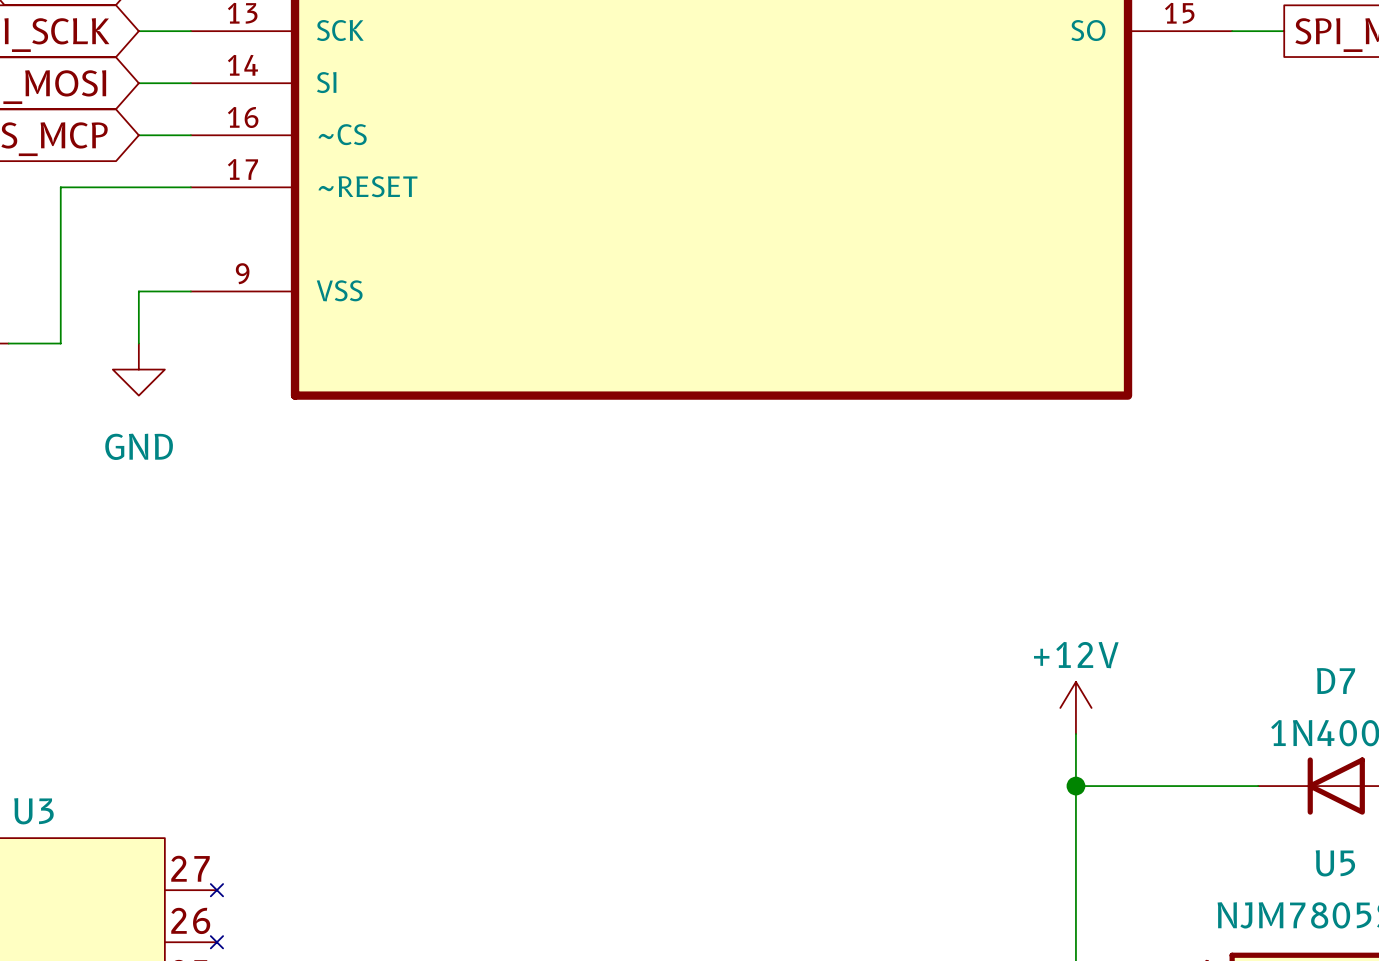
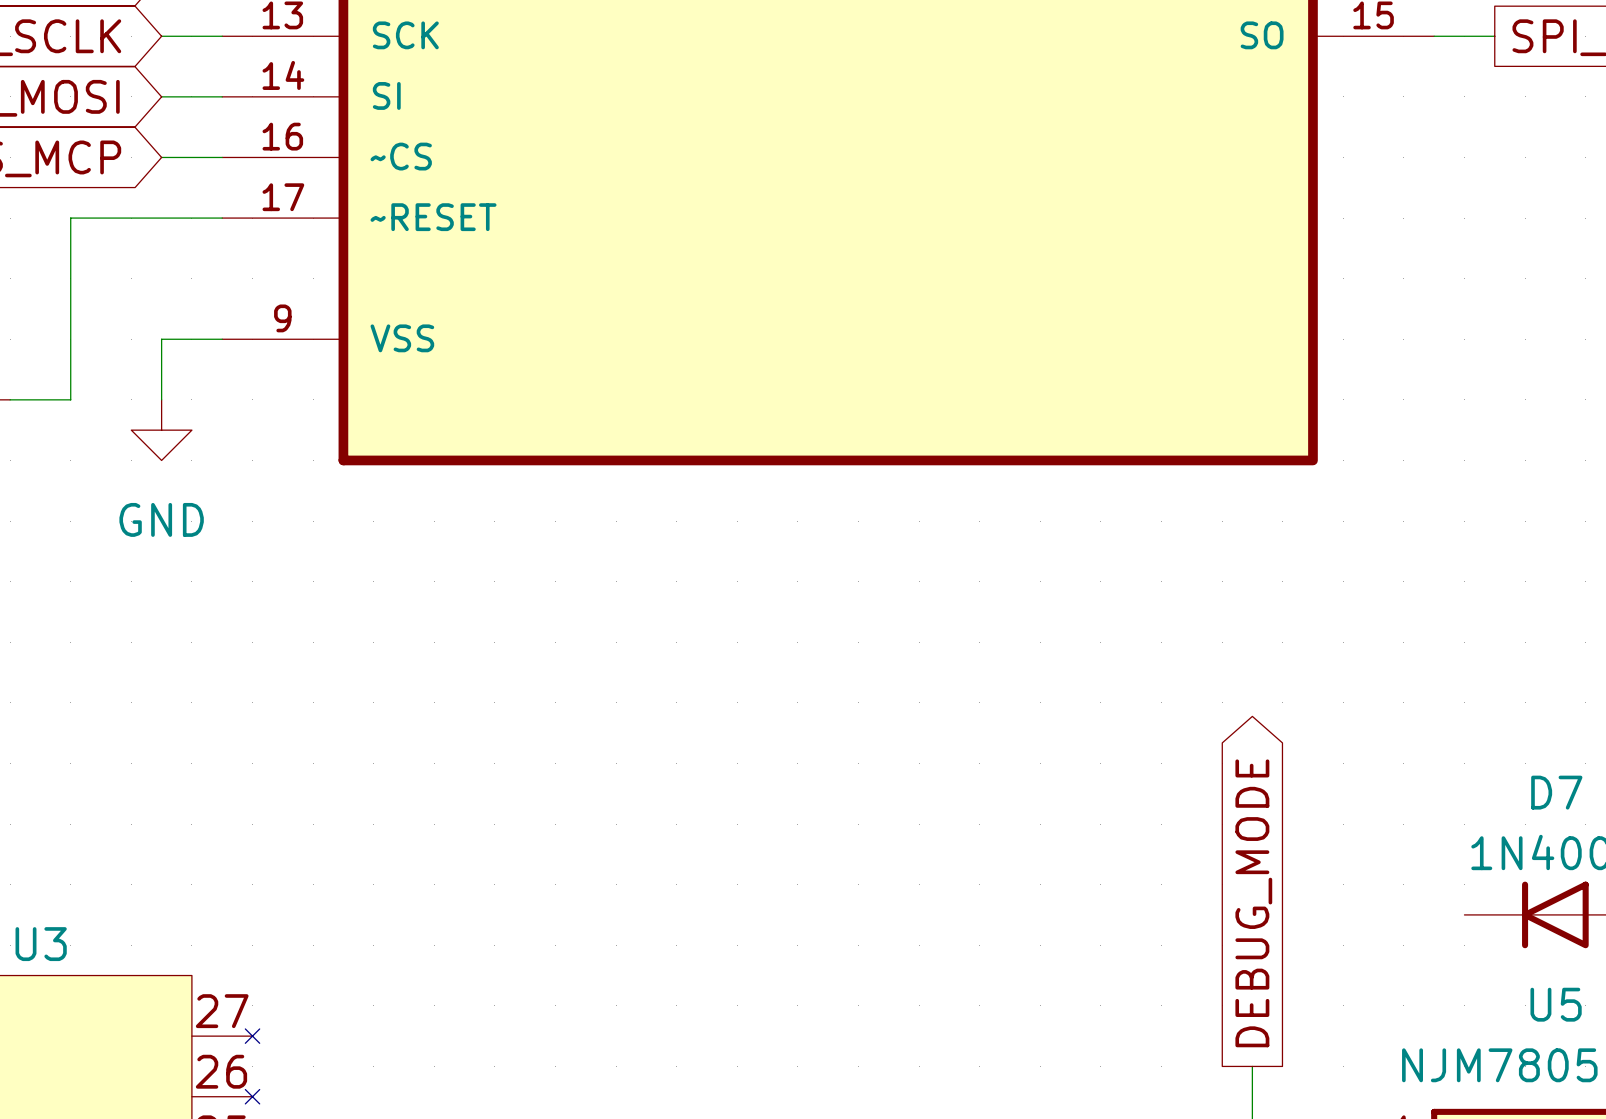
power symbol: +12V (1075, 707) -> none
wire: (1075, 733) (1075, 916) -> none
wire: (1075, 786) (1258, 786) -> none
junction: (1075, 786) -> none
global label: none -> DEBUG_MODE (1253, 903)

